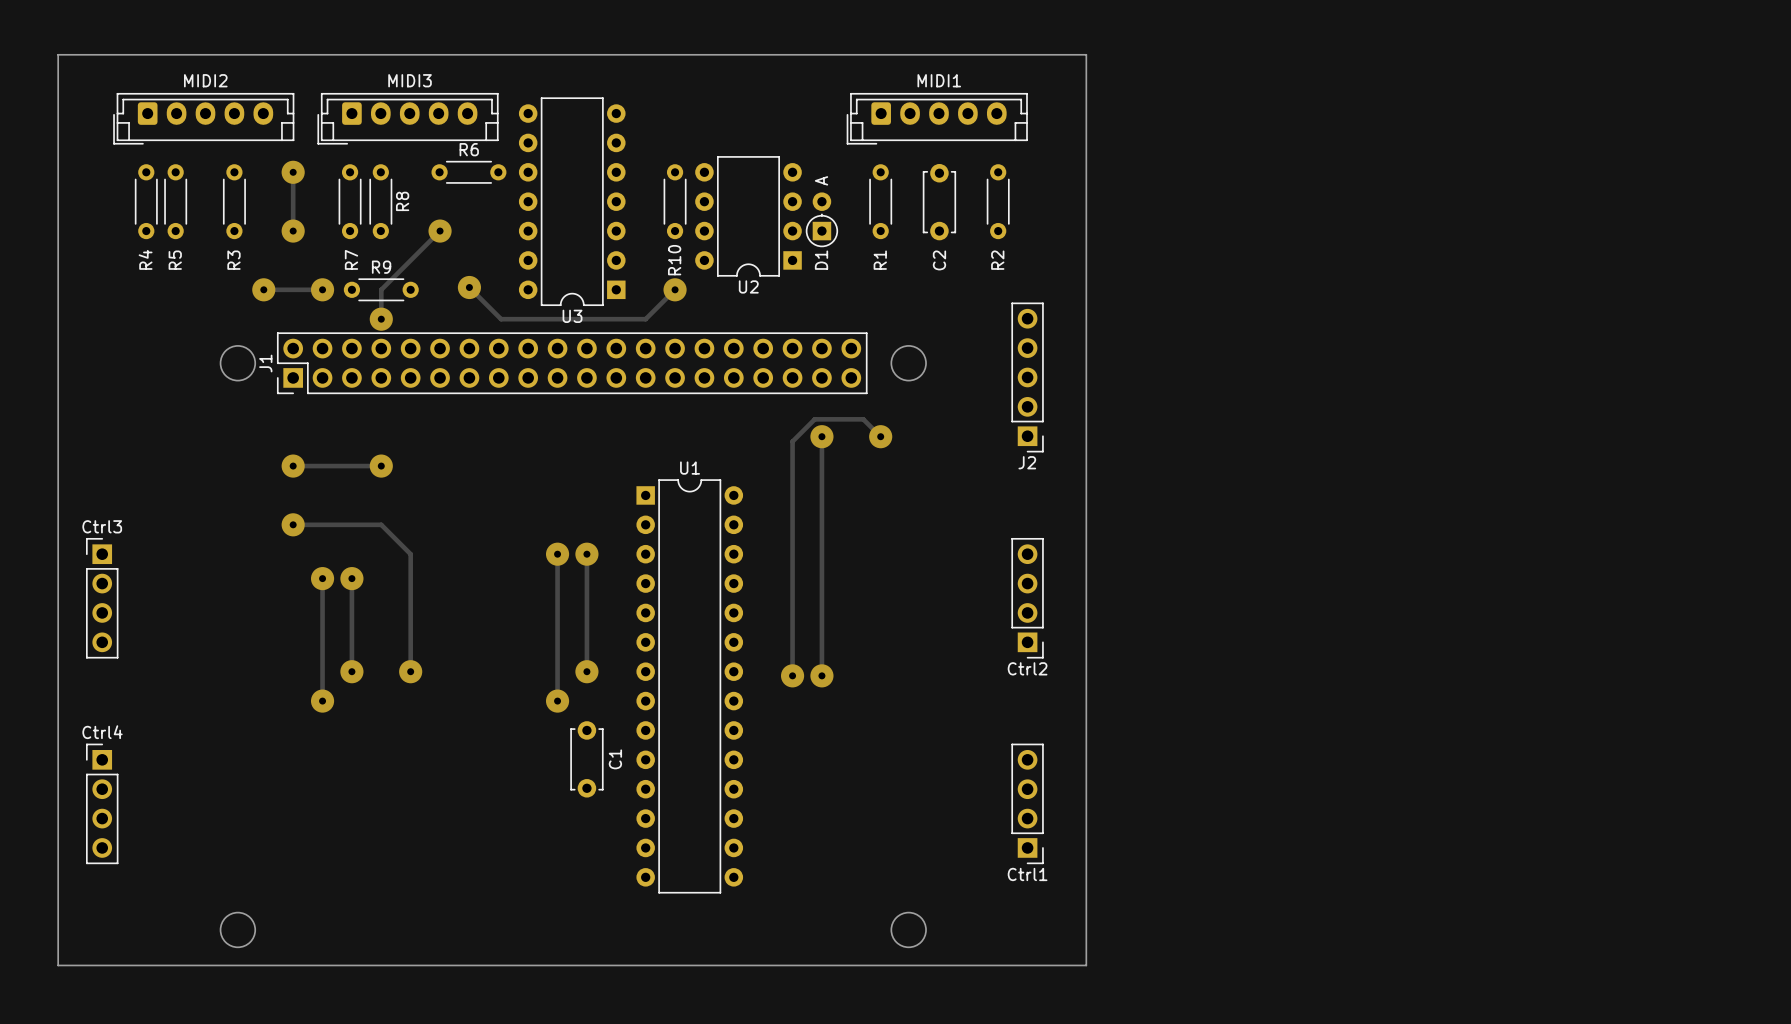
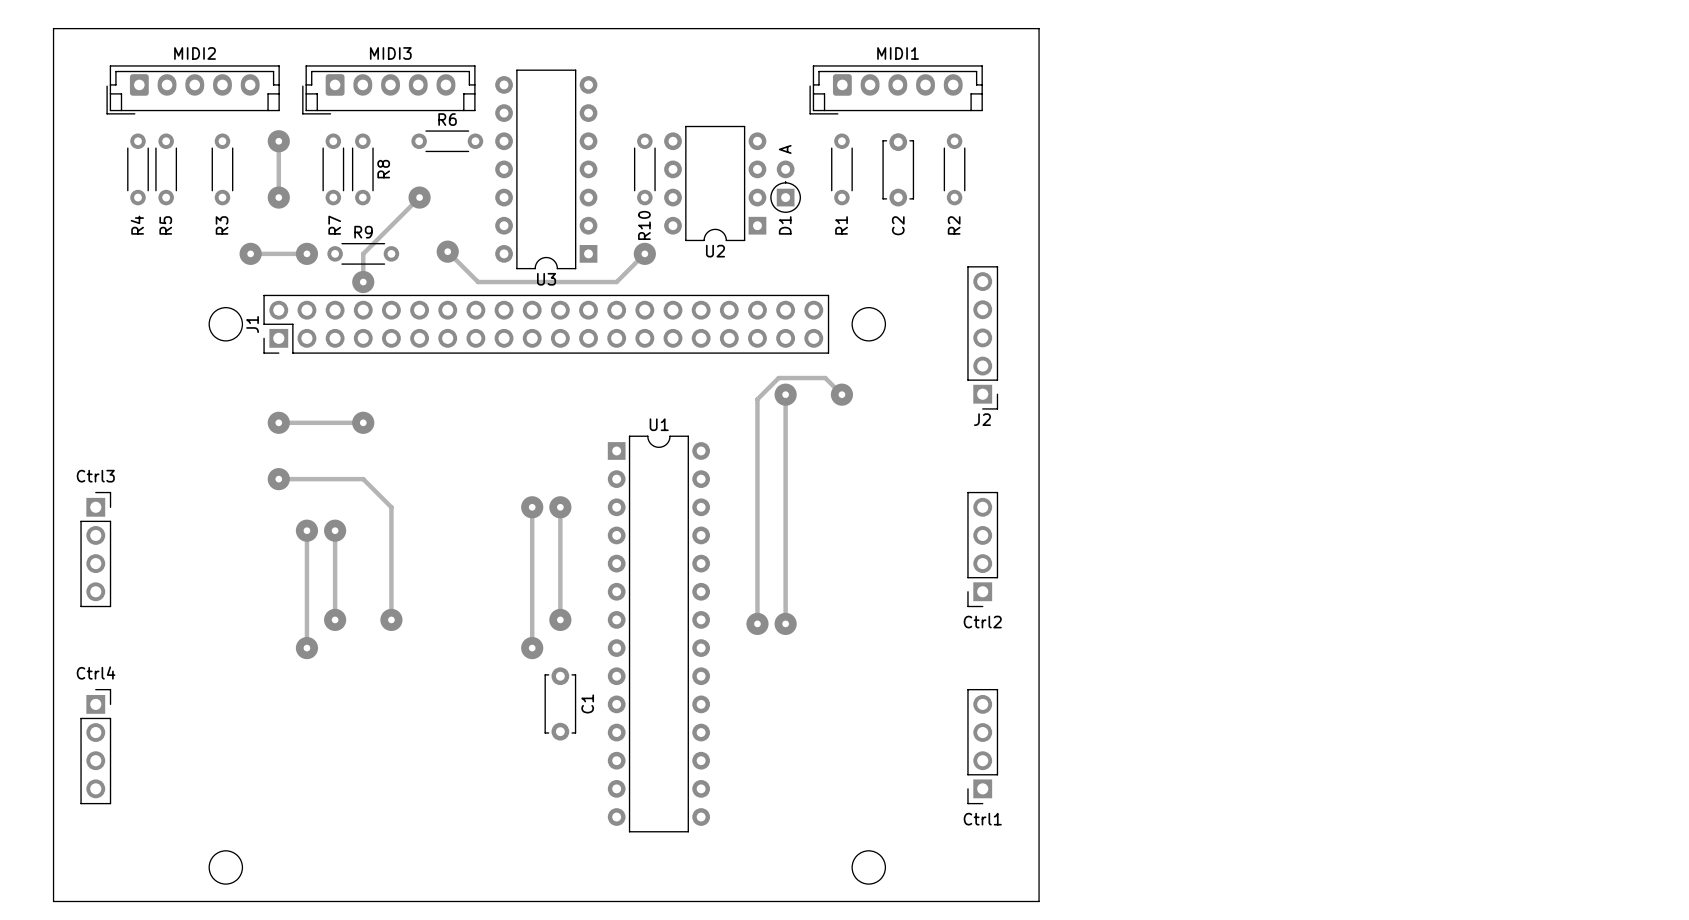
Ctrl3 footprint: [86, 538, 119, 659] -> [80, 491, 112, 608]
Ctrl2 footprint: [1011, 538, 1044, 659] -> [967, 491, 999, 608]
Ctrl4 footprint: [86, 743, 119, 865] -> [80, 688, 112, 805]
Ctrl1 footprint: [1011, 743, 1044, 865] -> [967, 688, 999, 805]

